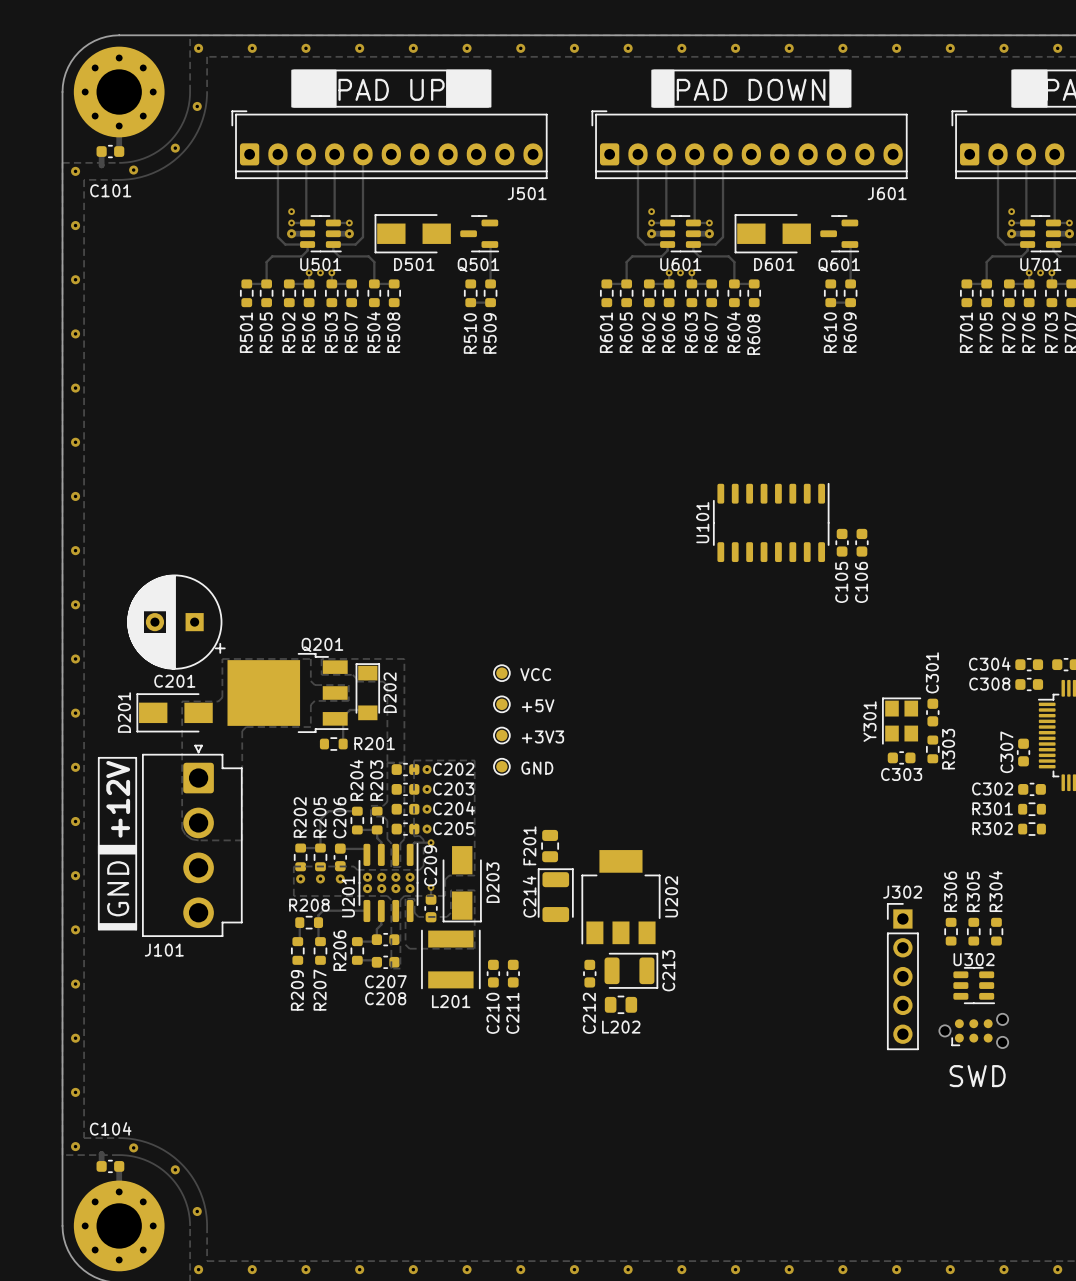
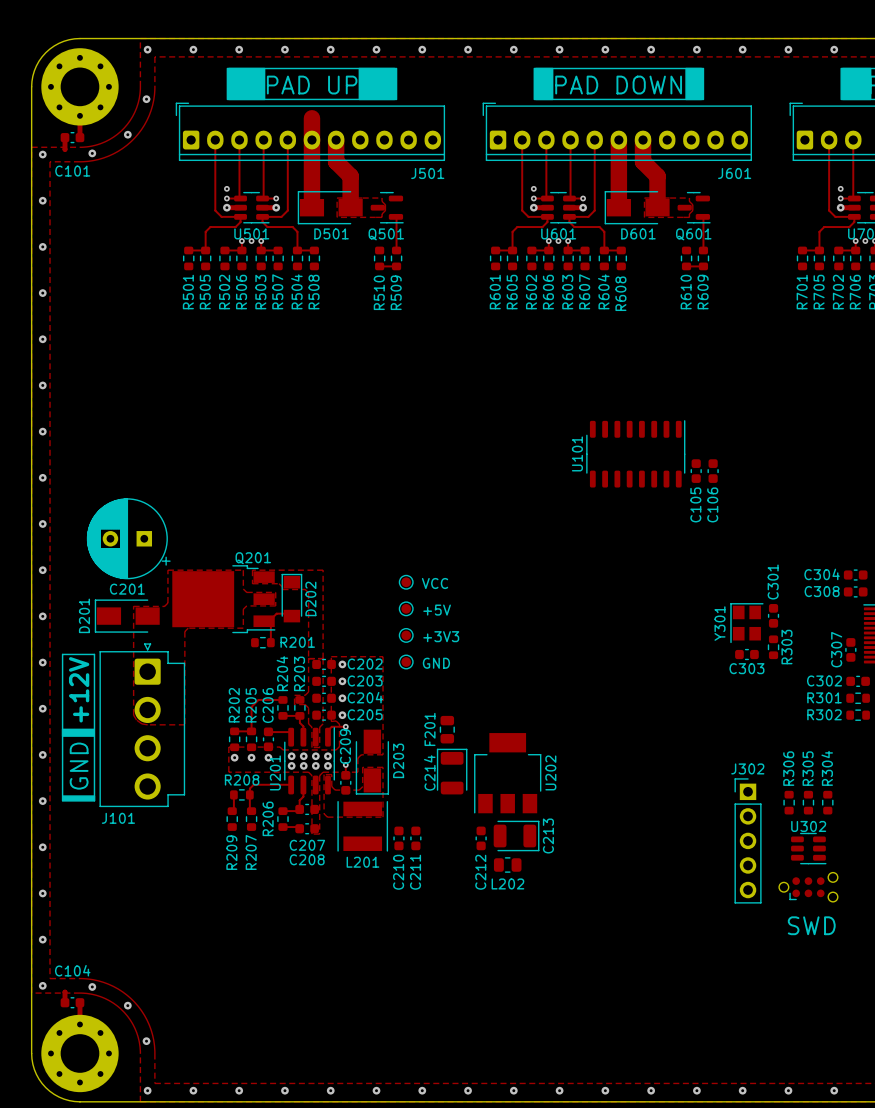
track: none -> (311, 118) (311, 207)
track: none -> (336, 140) (336, 161) (350, 176) (350, 207)
track: none -> (618, 140) (618, 207)
track: none -> (643, 140) (643, 161) (657, 176) (657, 207)
zone outline: none -> (337, 198) (382, 198) (382, 201) (385, 204) (385, 210) (382, 213) (382, 217) (337, 217) (337, 198)
zone outline: none -> (644, 198) (689, 198) (689, 201) (692, 204) (692, 210) (689, 213) (689, 217) (644, 217) (644, 198)

